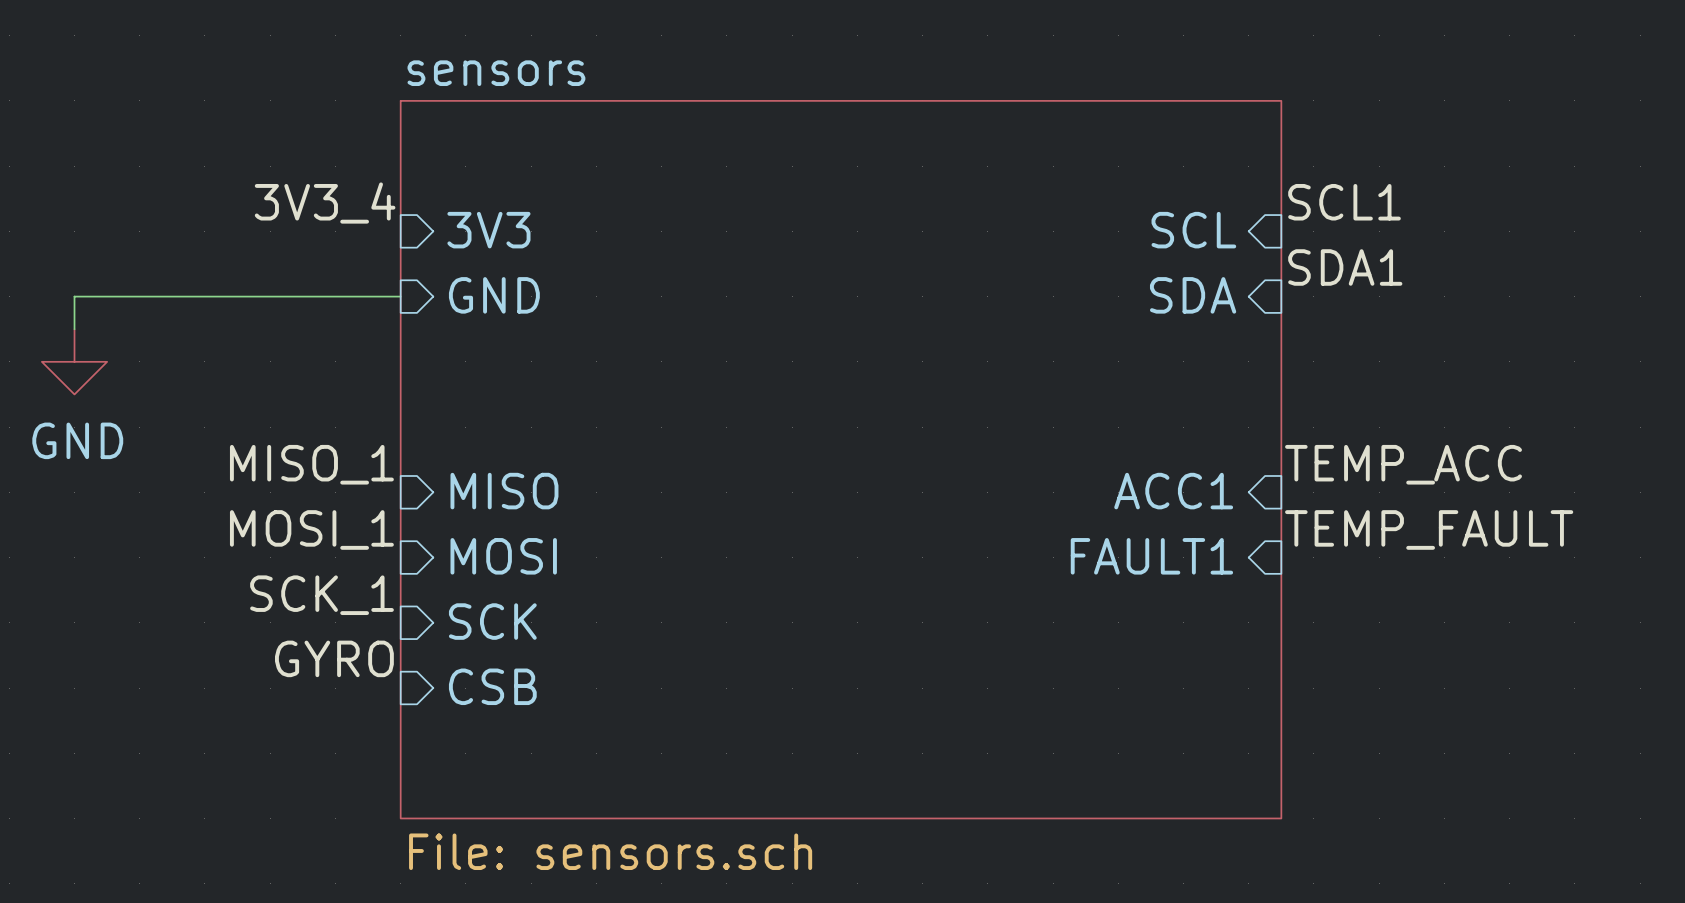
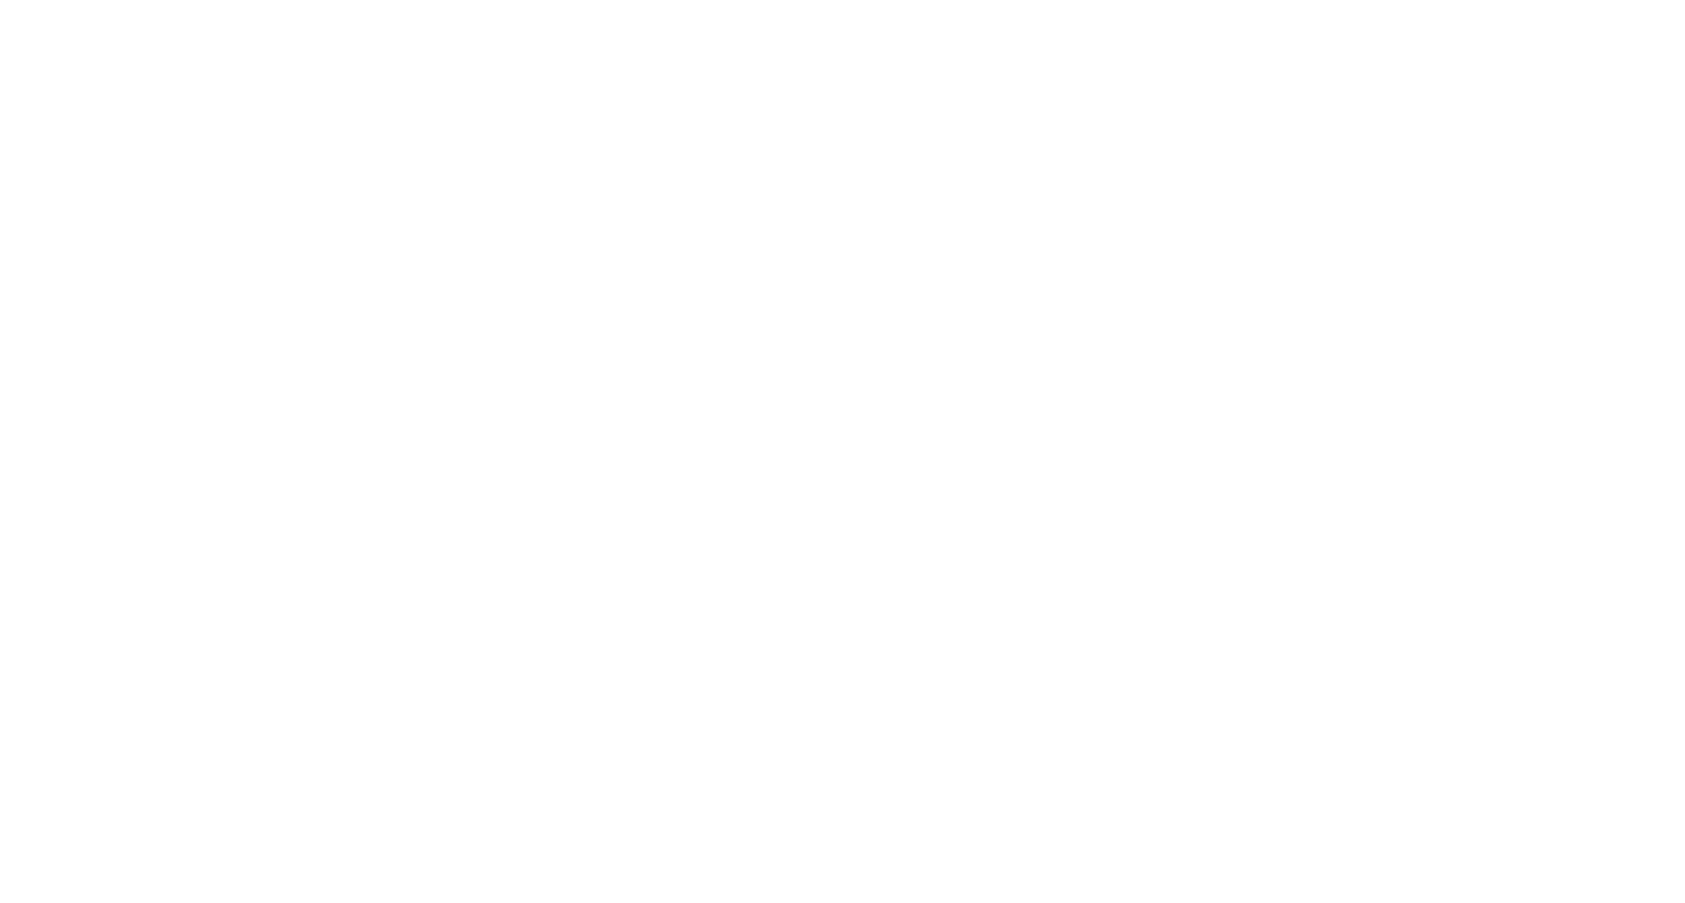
label: SCL1 (1344, 202) -> none
label: 3V3_4 (325, 203) -> none
sheet pin: 3V3 (488, 230) -> none
sheet pin: SCL (1193, 230) -> none
label: SDA1 (1345, 267) -> none
sheet pin: GND (494, 295) -> none
sheet pin: SDA (1193, 295) -> none
wire: (400, 296) (74, 296) (74, 329) -> none
power symbol: GND (74, 361) -> none
sheet sensors: File: sensors.sch (841, 459) -> none
label: MISO_1 (311, 464) -> none
label: TEMP_ACC (1403, 464) -> none
sheet pin: MISO (504, 491) -> none
sheet pin: ACC1 (1173, 491) -> none
label: MOSI_1 (311, 529) -> none
label: TEMP_FAULT (1429, 529) -> none
sheet pin: MOSI (503, 556) -> none
sheet pin: FAULT1 (1151, 556) -> none
label: SCK_1 (322, 595) -> none
sheet pin: SCK (492, 621) -> none
label: GYRO (334, 658) -> none
sheet pin: CSB (492, 686) -> none

